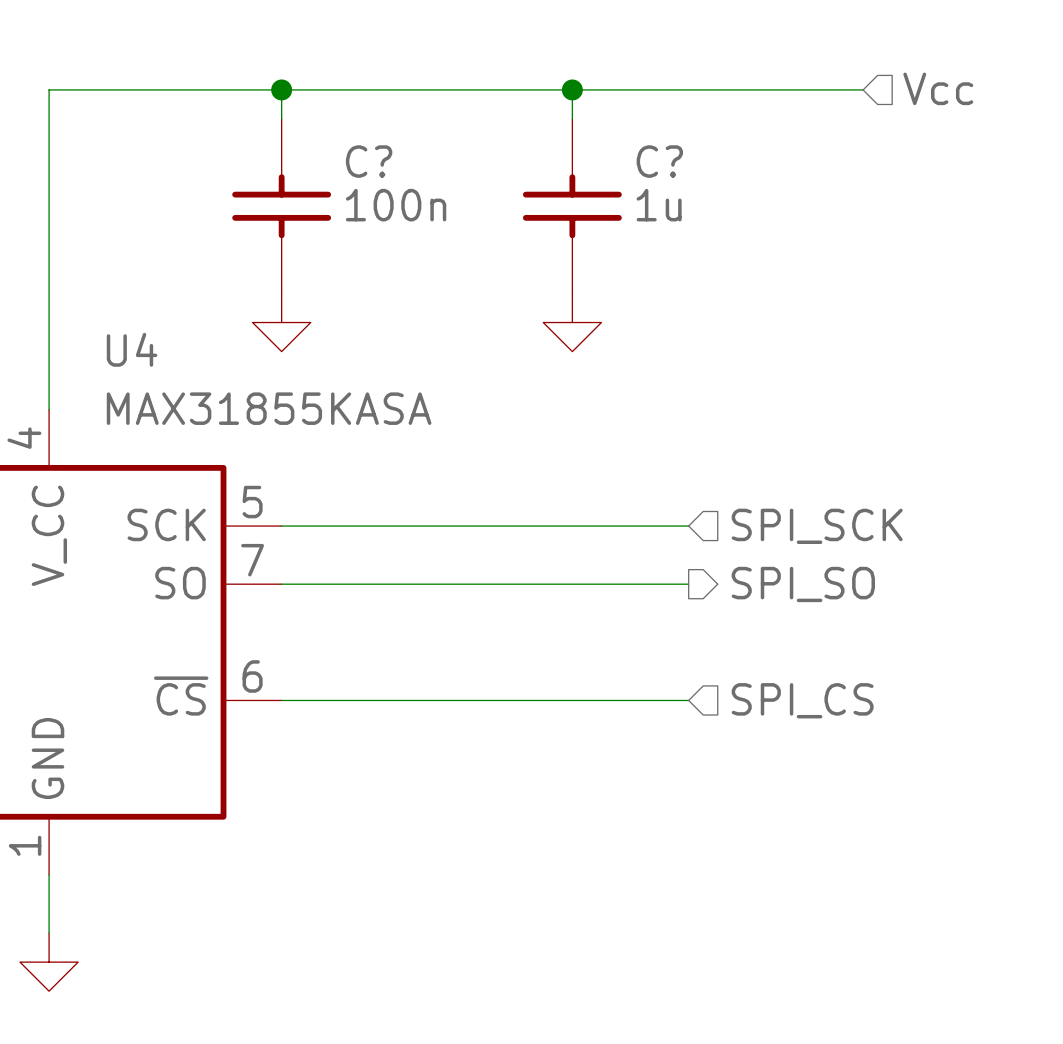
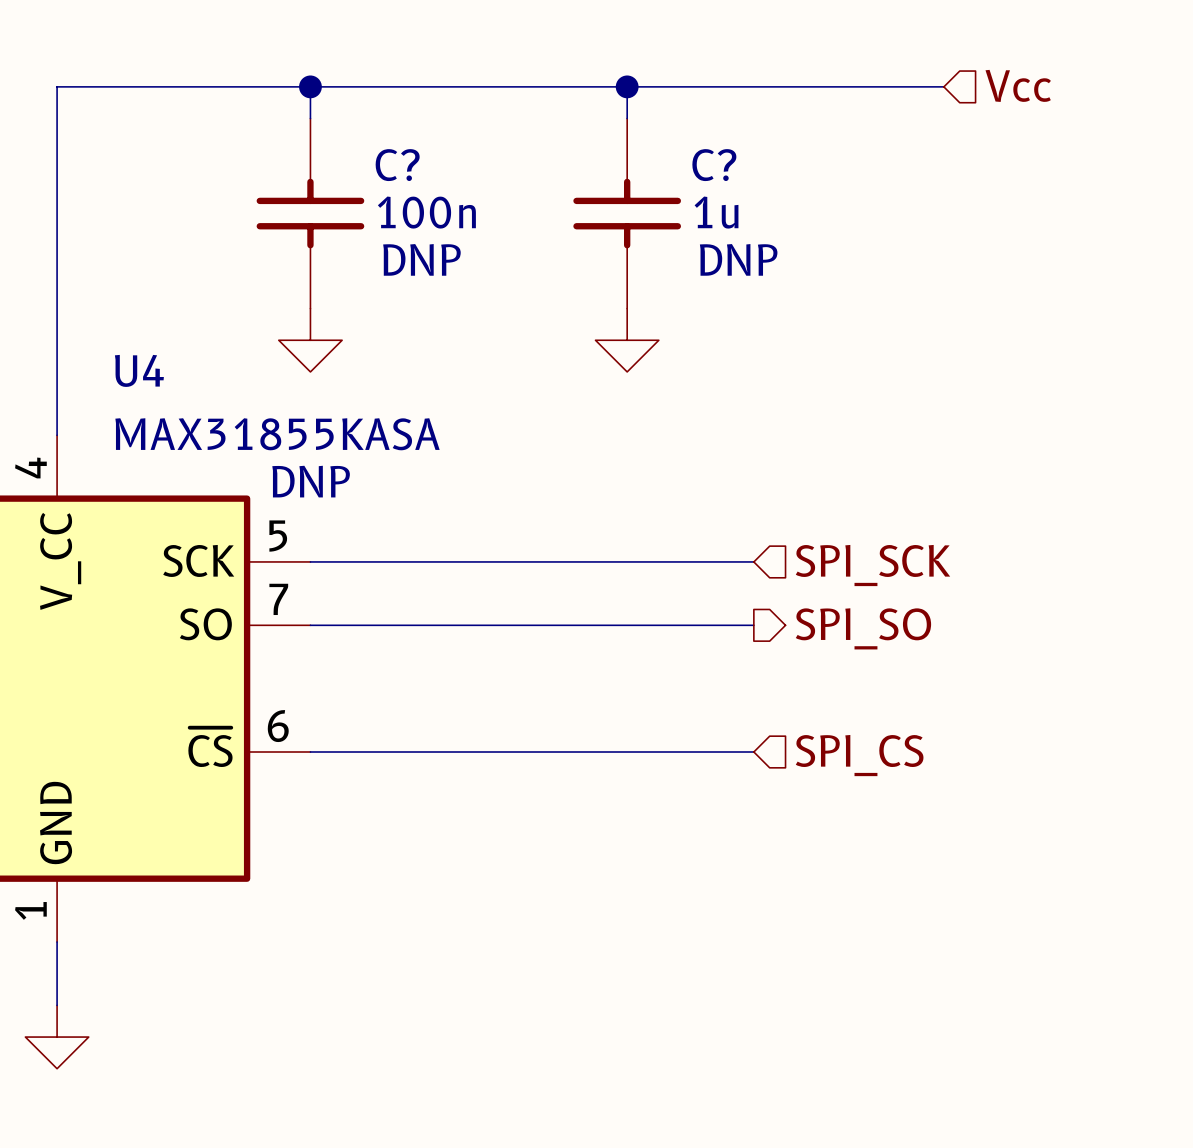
C? text: none -> DNP (421, 259)
C? text: none -> DNP (738, 259)
U4 text: none -> DNP (311, 481)

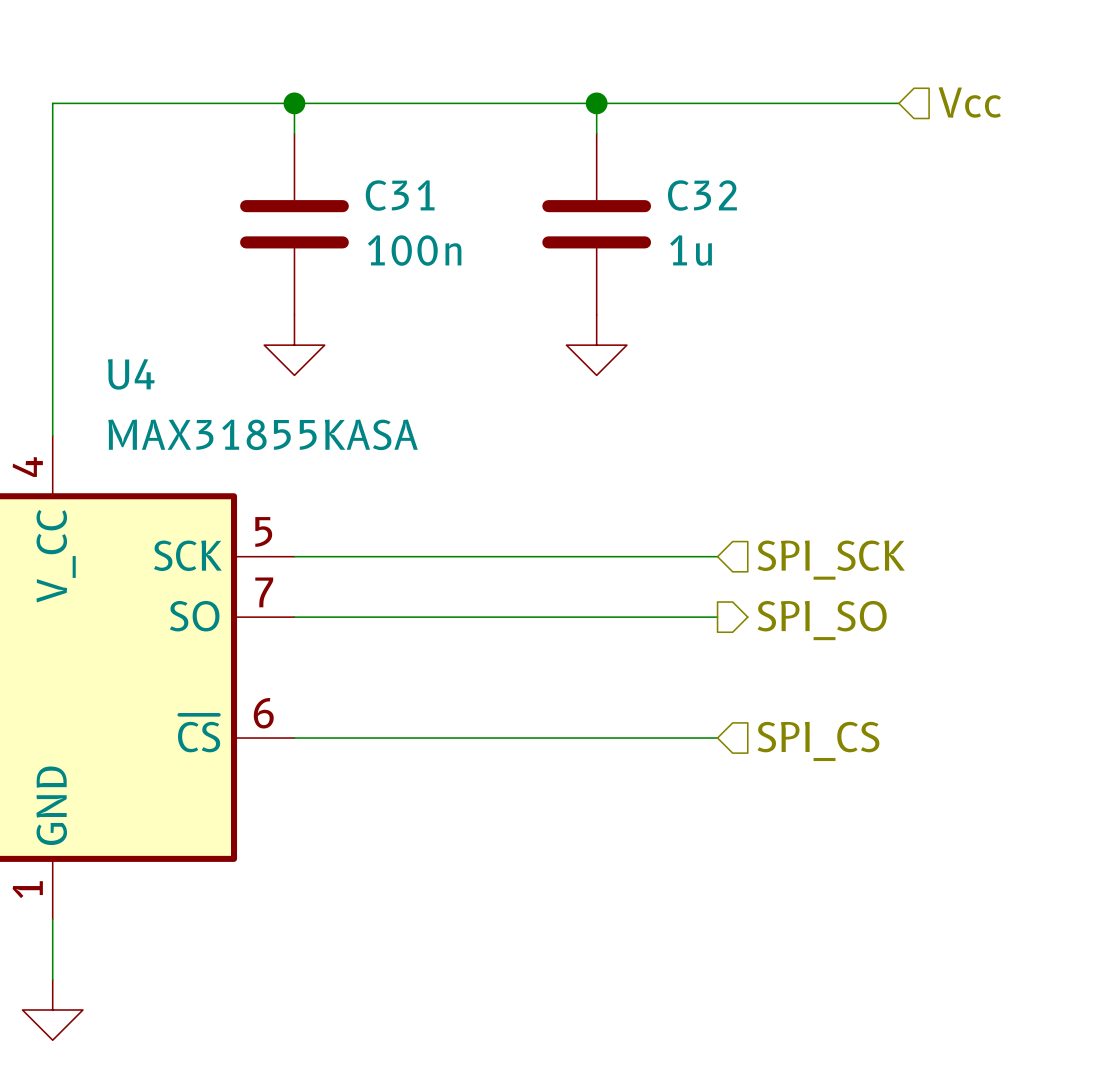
C?: 100n (310, 213) -> none
C31: none -> 100n (294, 224)
C?: 1u (627, 213) -> none
C32: none -> 1u (596, 224)
U4 text: DNP (311, 481) -> none

